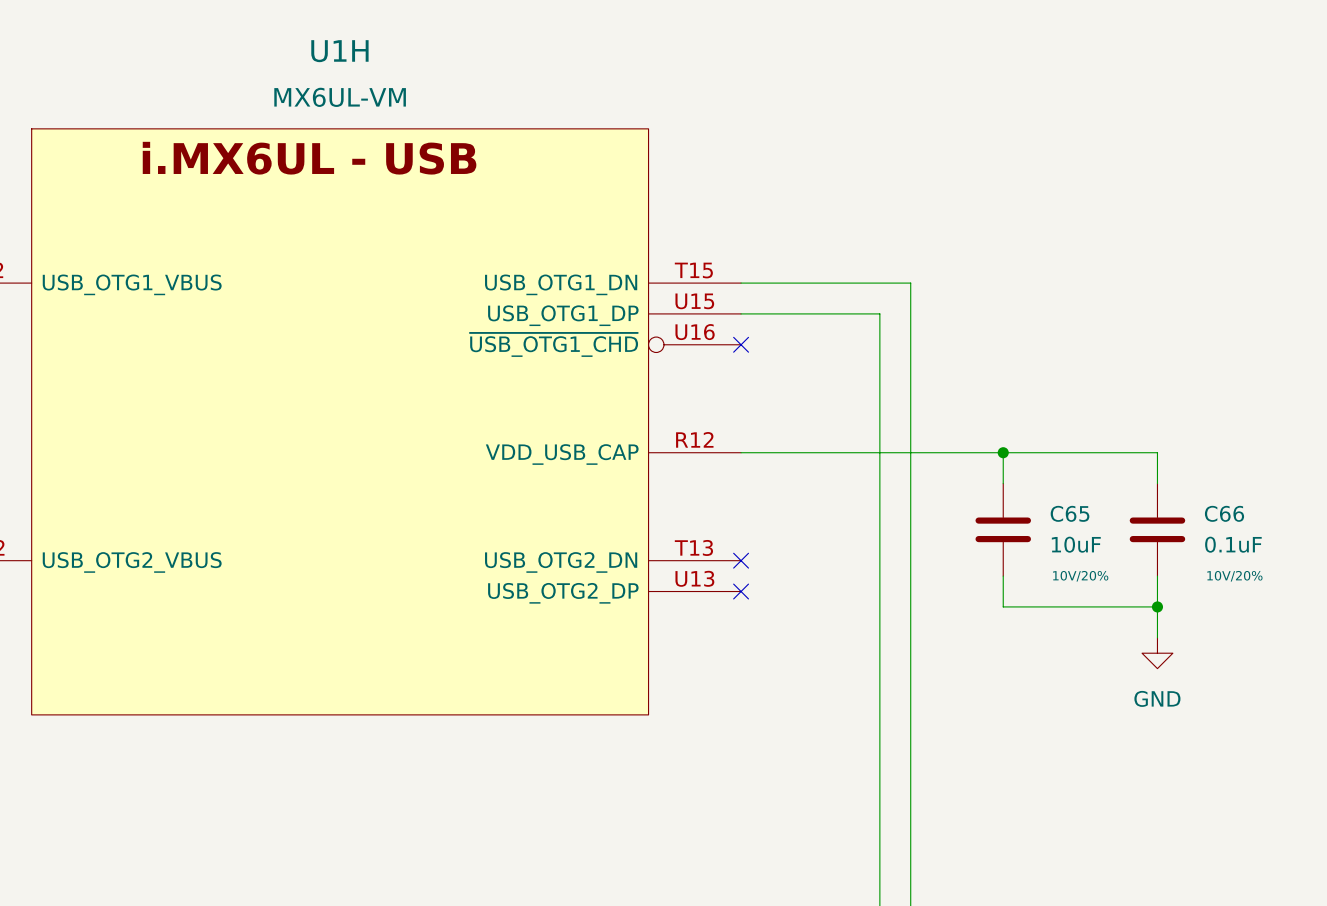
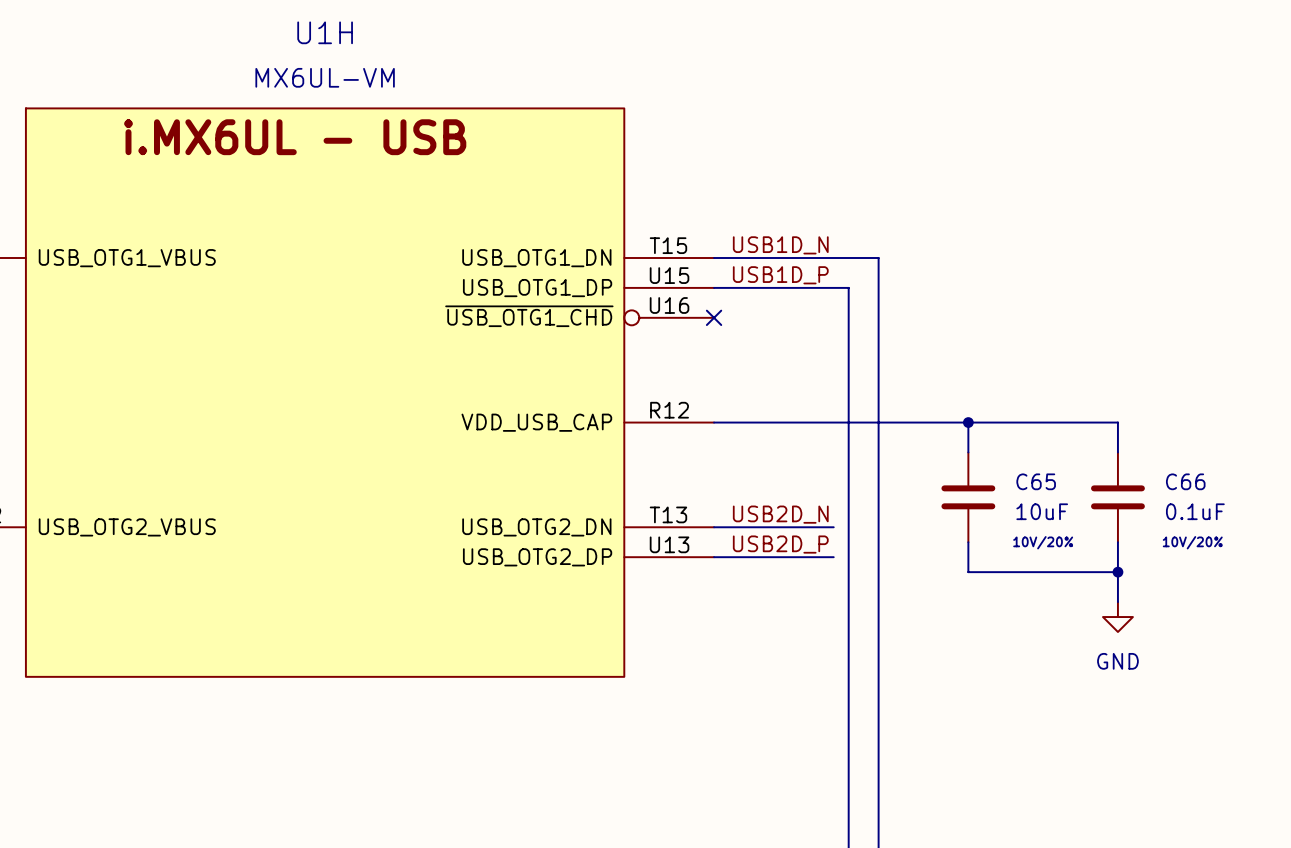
label: none -> USB1D_N (780, 245)
label: none -> USB1D_P (780, 275)
label: none -> USB2D_N (780, 514)
wire: none -> (714, 527) (833, 527)
no-connect mark: (741, 560) -> none
label: none -> USB2D_P (780, 544)
wire: none -> (714, 557) (833, 557)
no-connect mark: (741, 591) -> none

